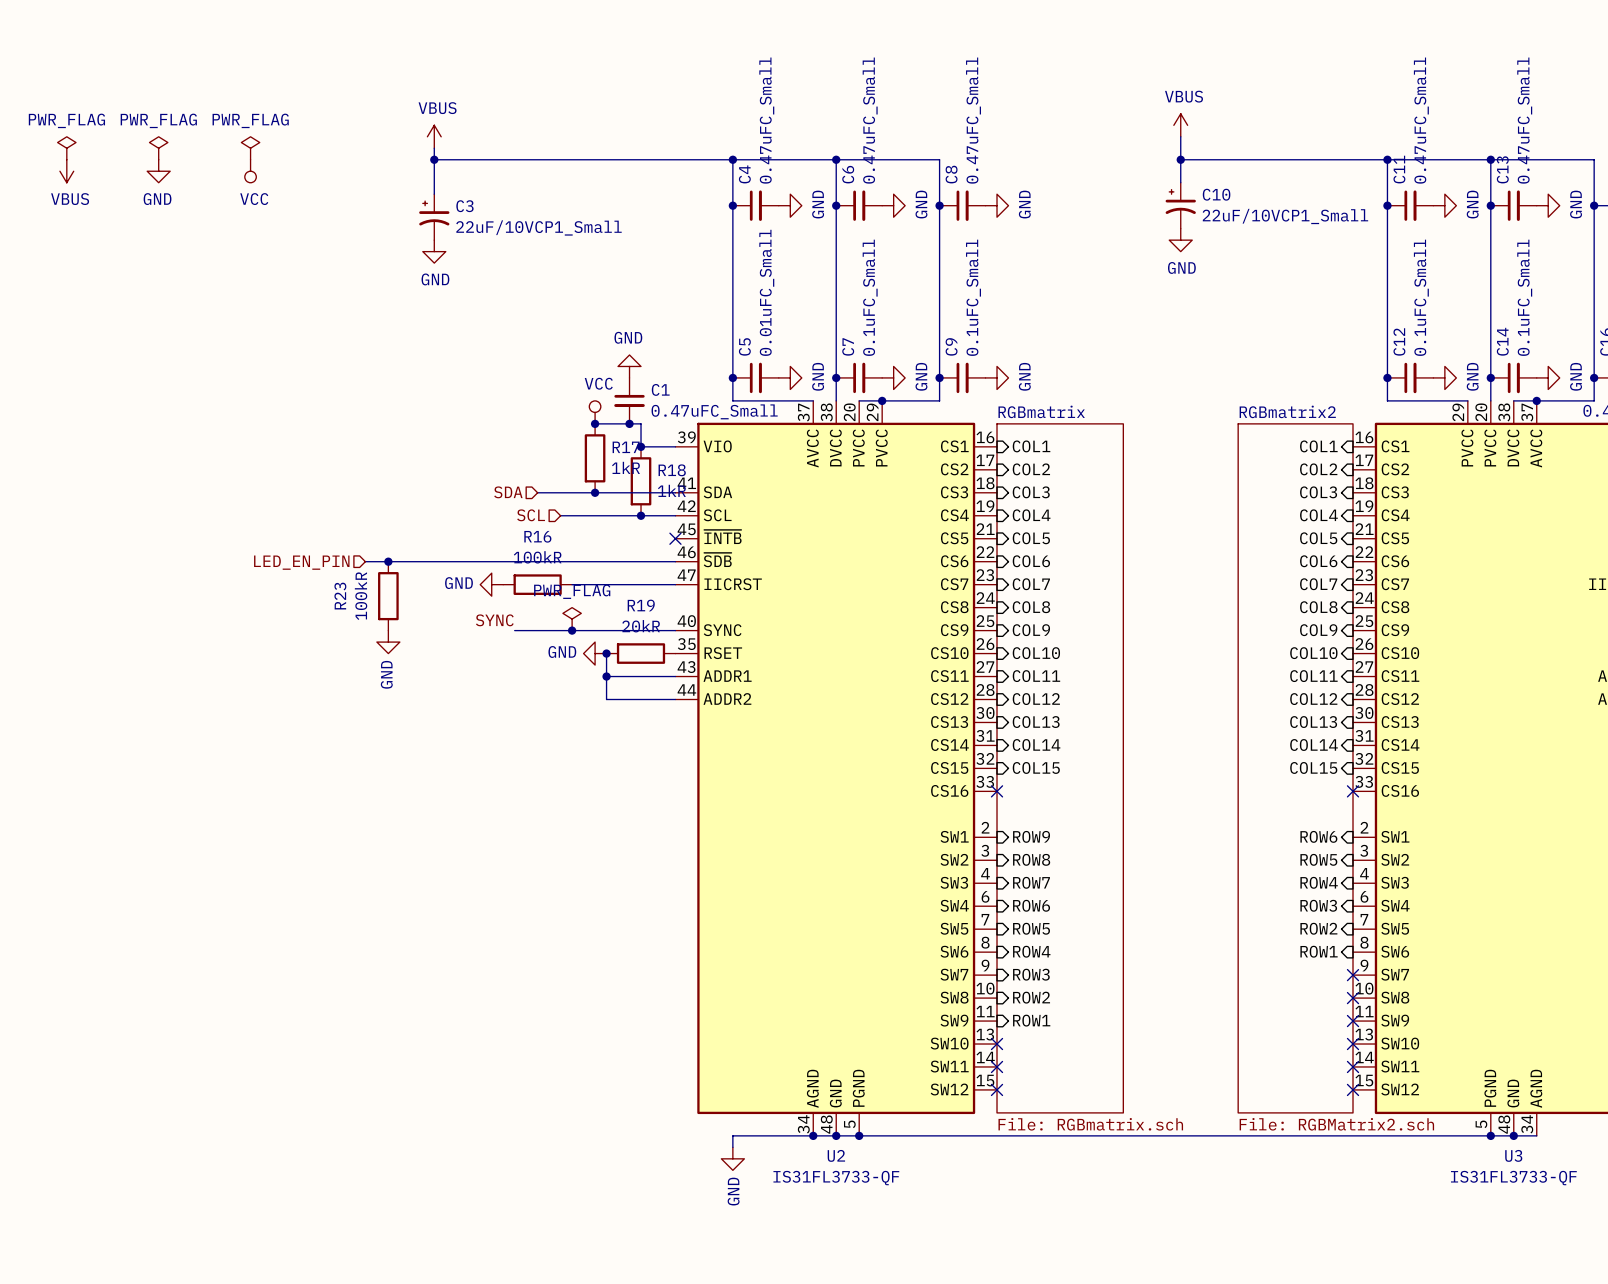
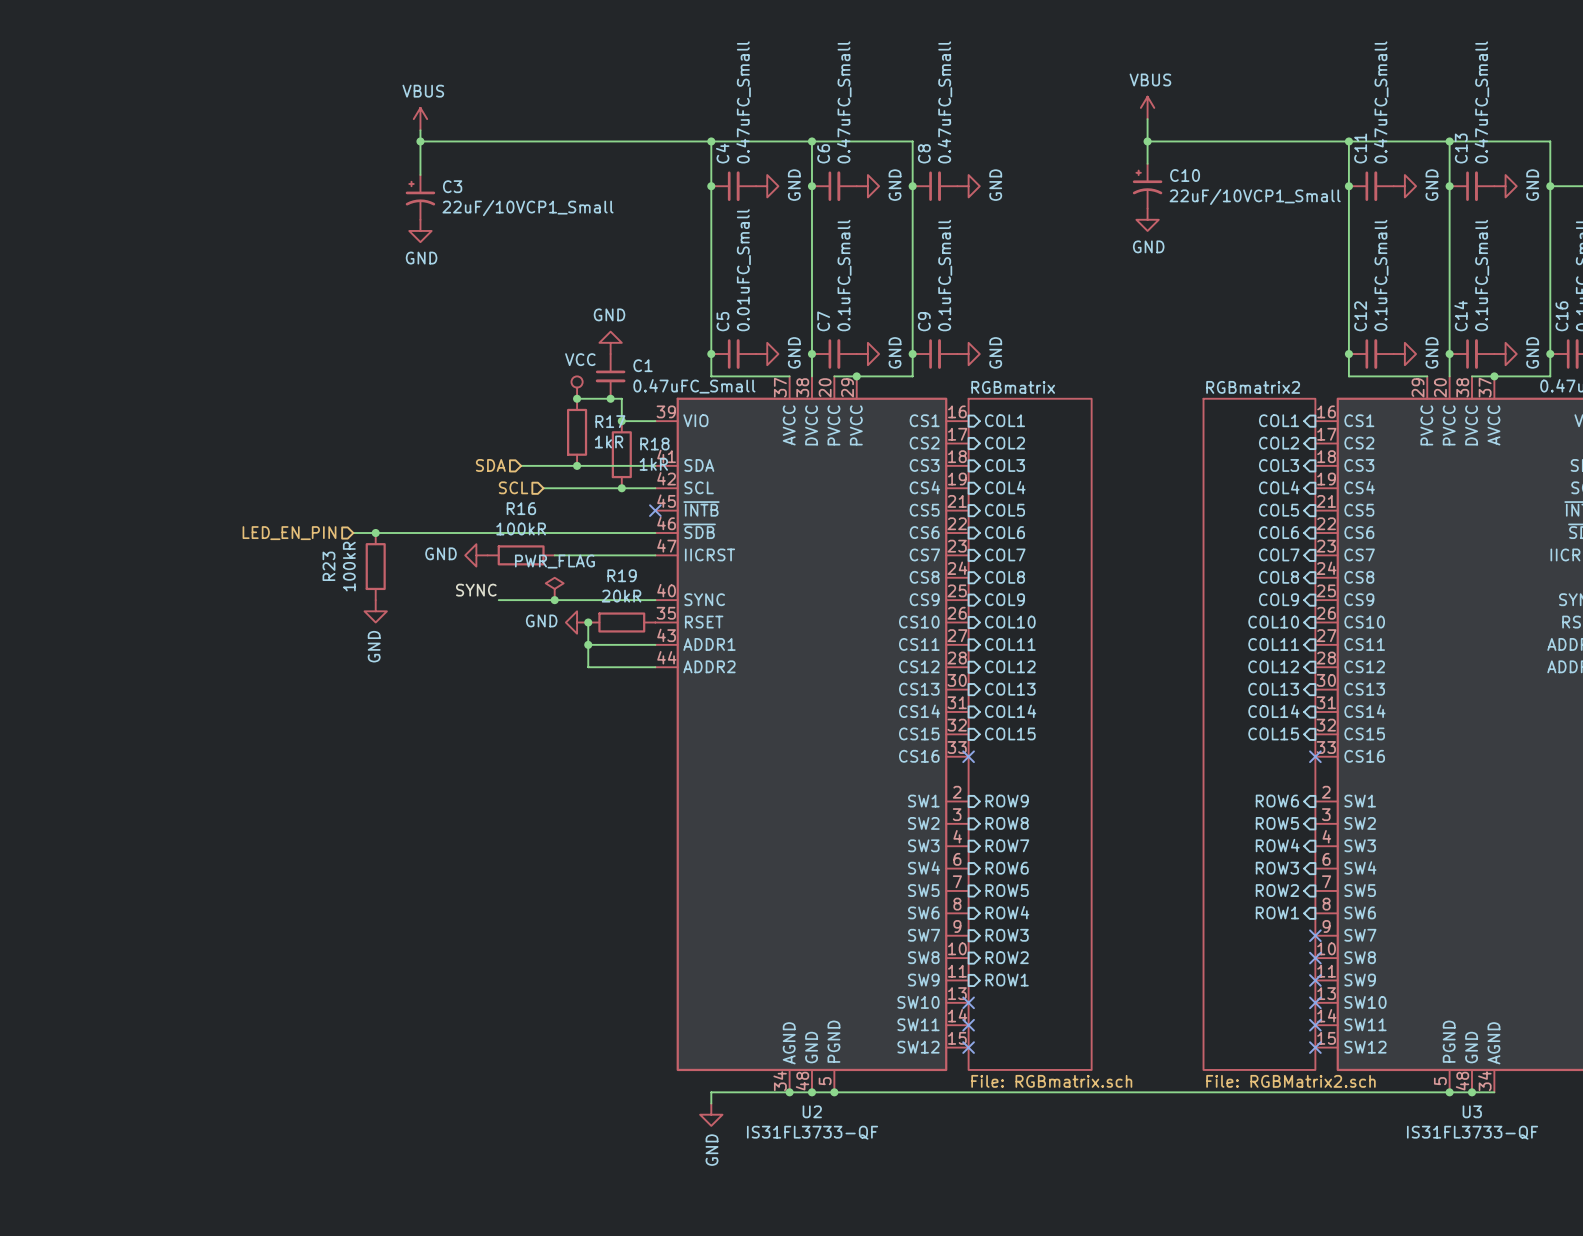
power symbol: PWR_FLAG (66, 148) -> none
power symbol: PWR_FLAG (158, 148) -> none
power symbol: PWR_FLAG (250, 148) -> none
power symbol: VBUS (66, 171) -> none
power symbol: GND (158, 171) -> none
power symbol: VCC (250, 171) -> none

